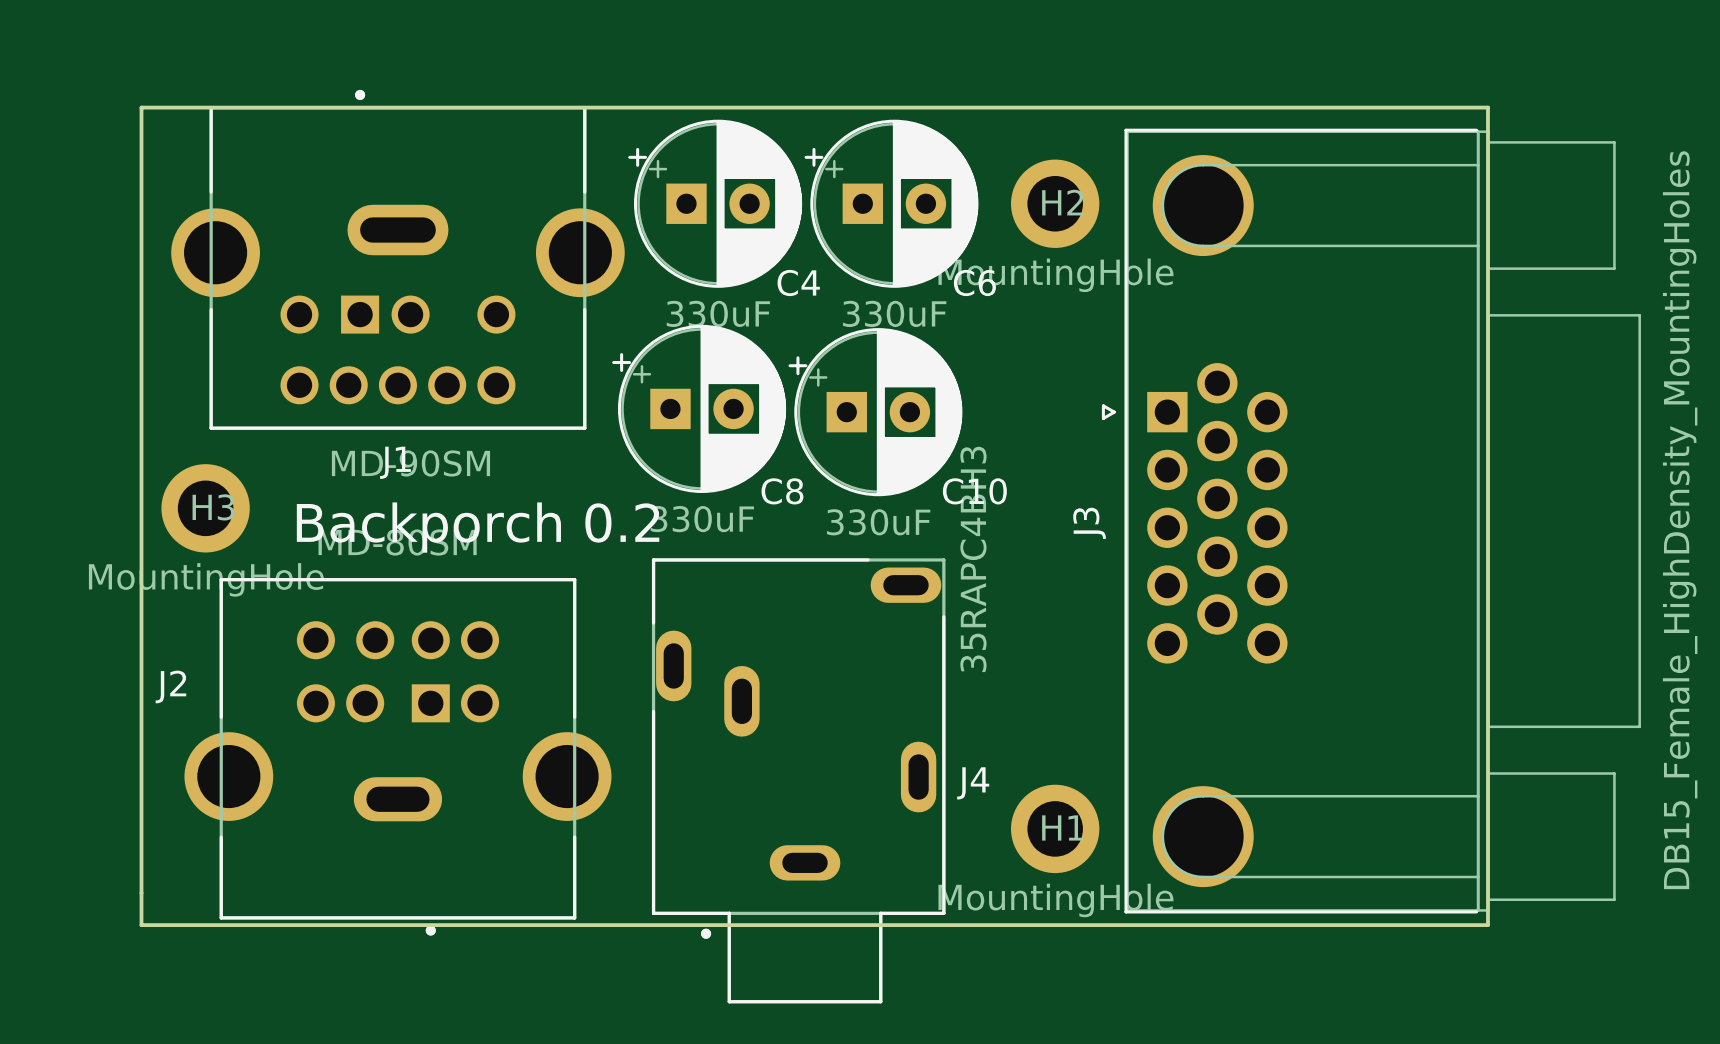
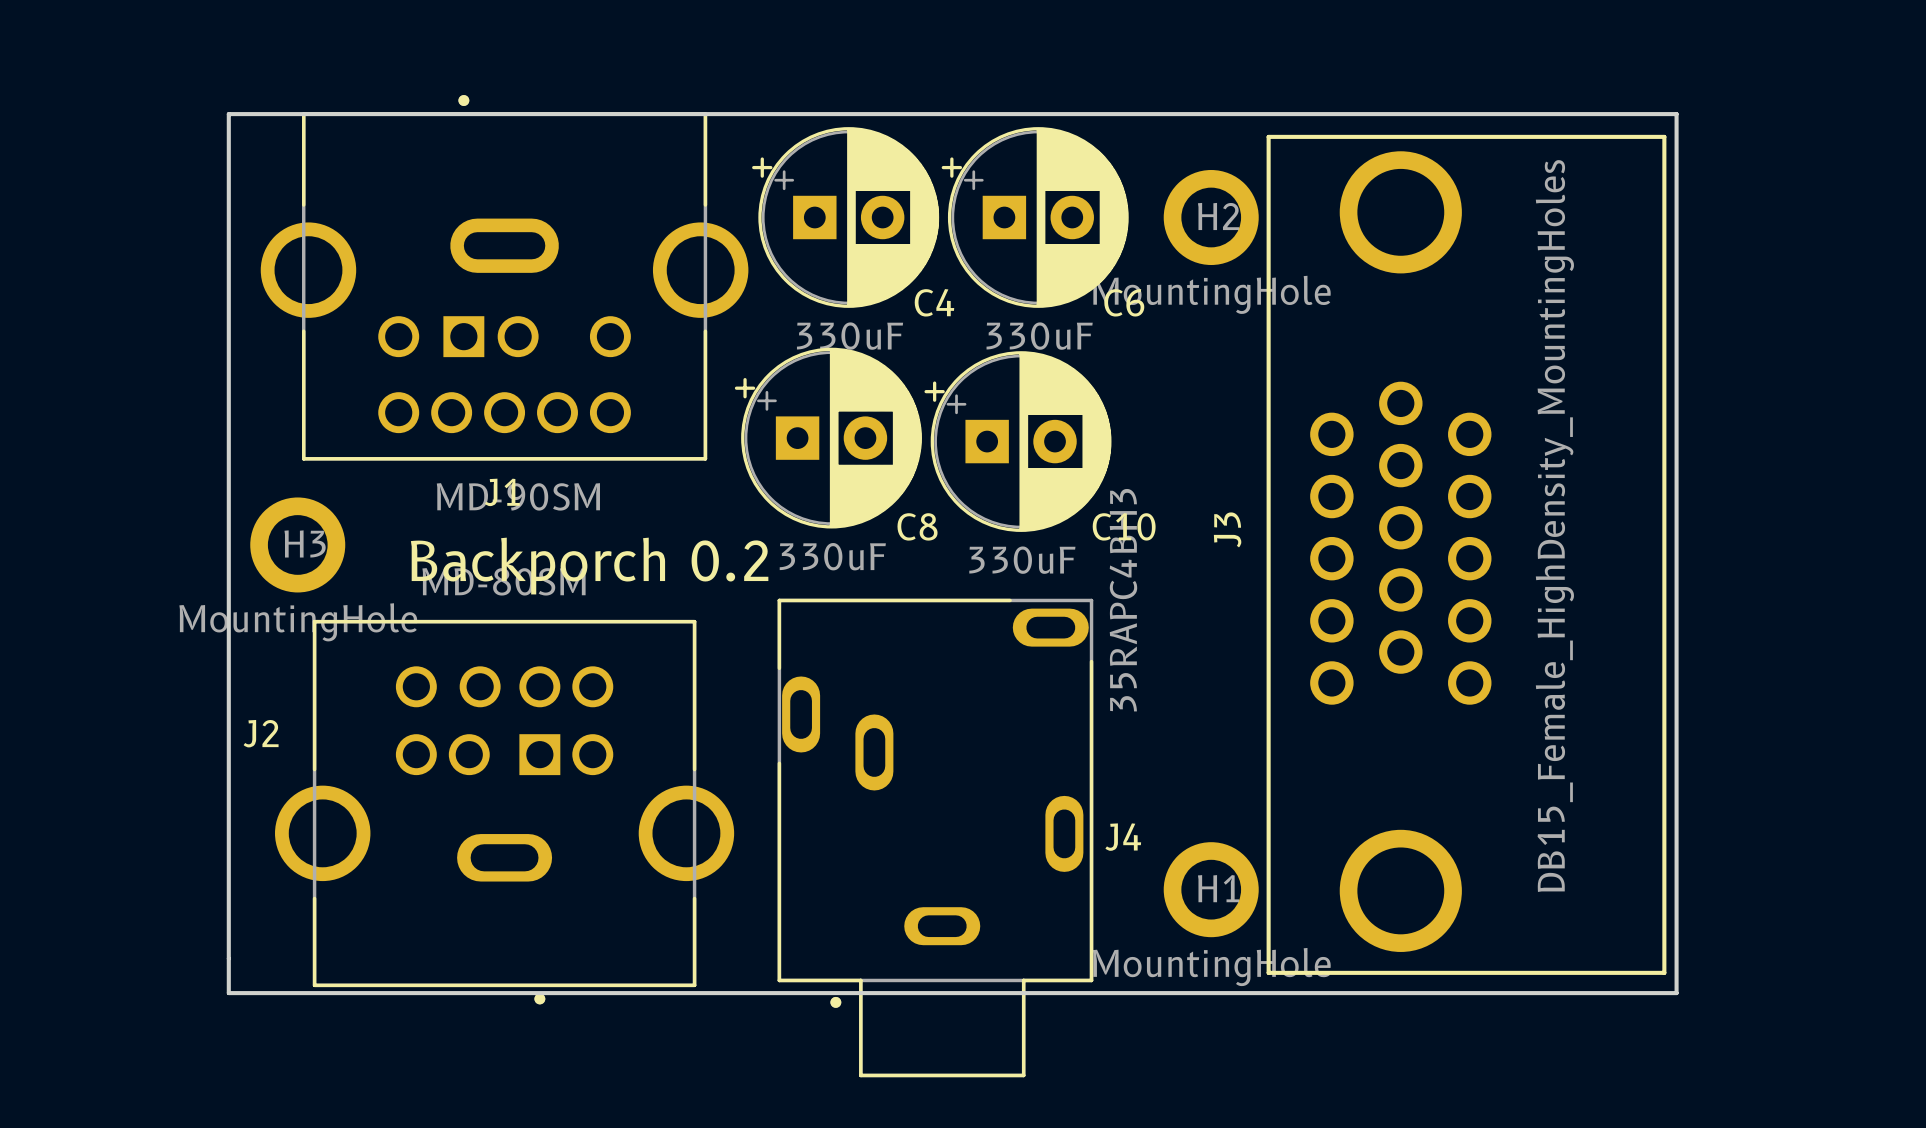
J3 footprint: [1101, 128, 1641, 914] -> [1266, 134, 1667, 975]
J3 value position: DB15_Female_HighDensity_MountingHoles (1680, 520) -> DB15_Female_HighDensity_MountingHoles (1554, 526)
J3 name position: J3 (1089, 523) -> J3 (1227, 529)

